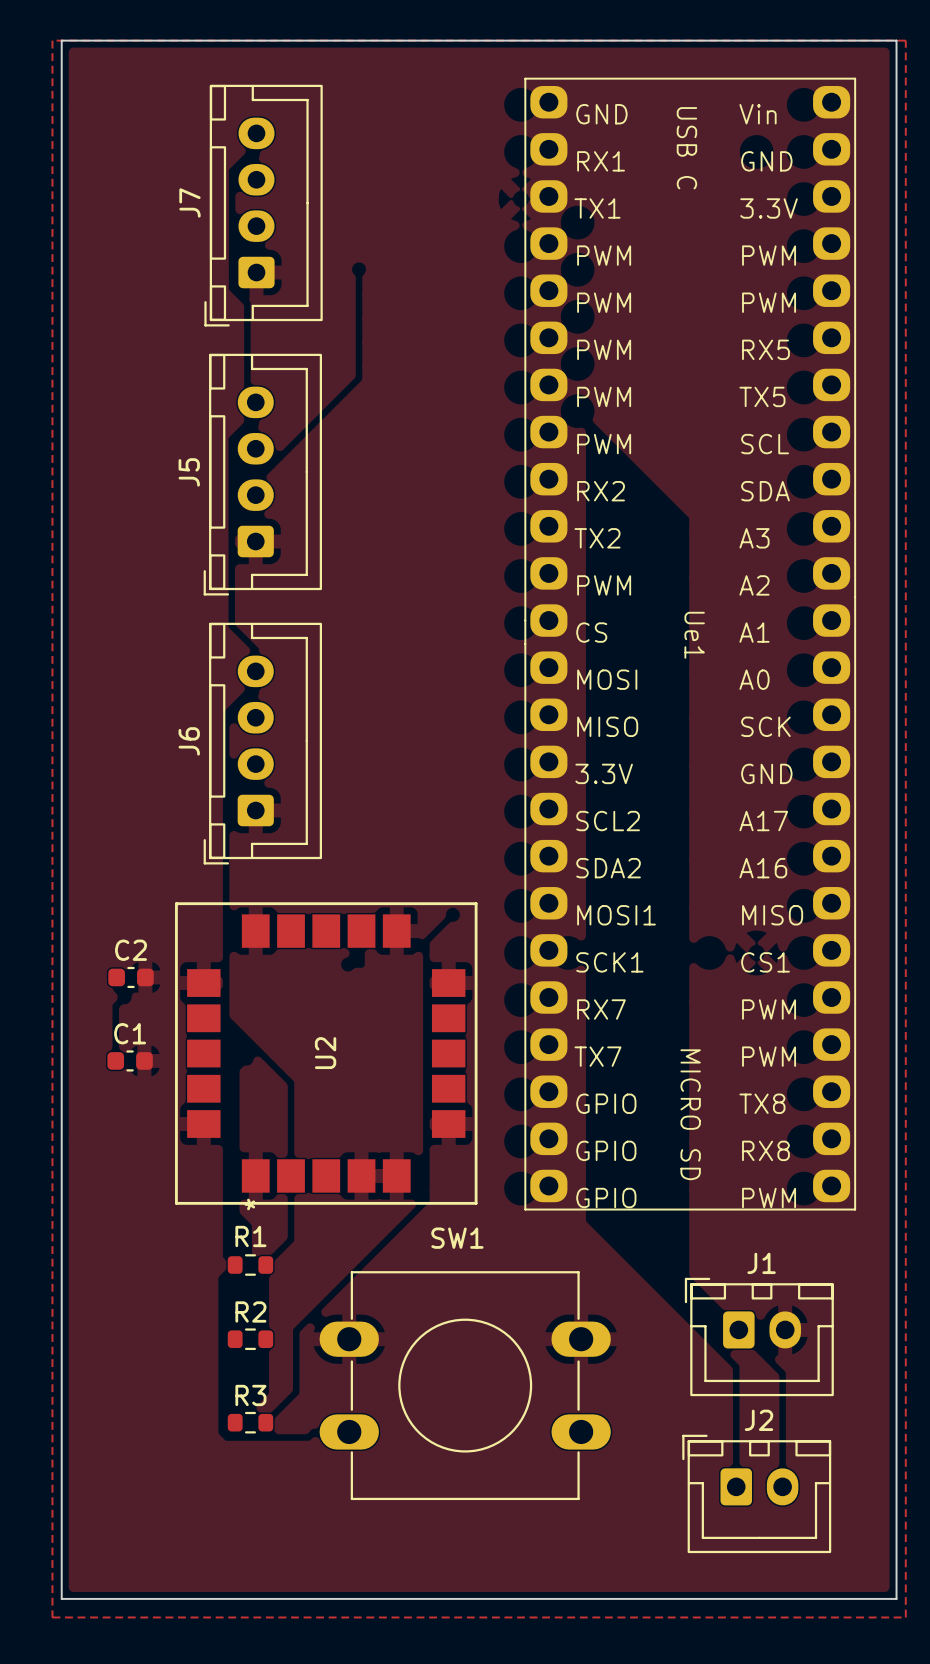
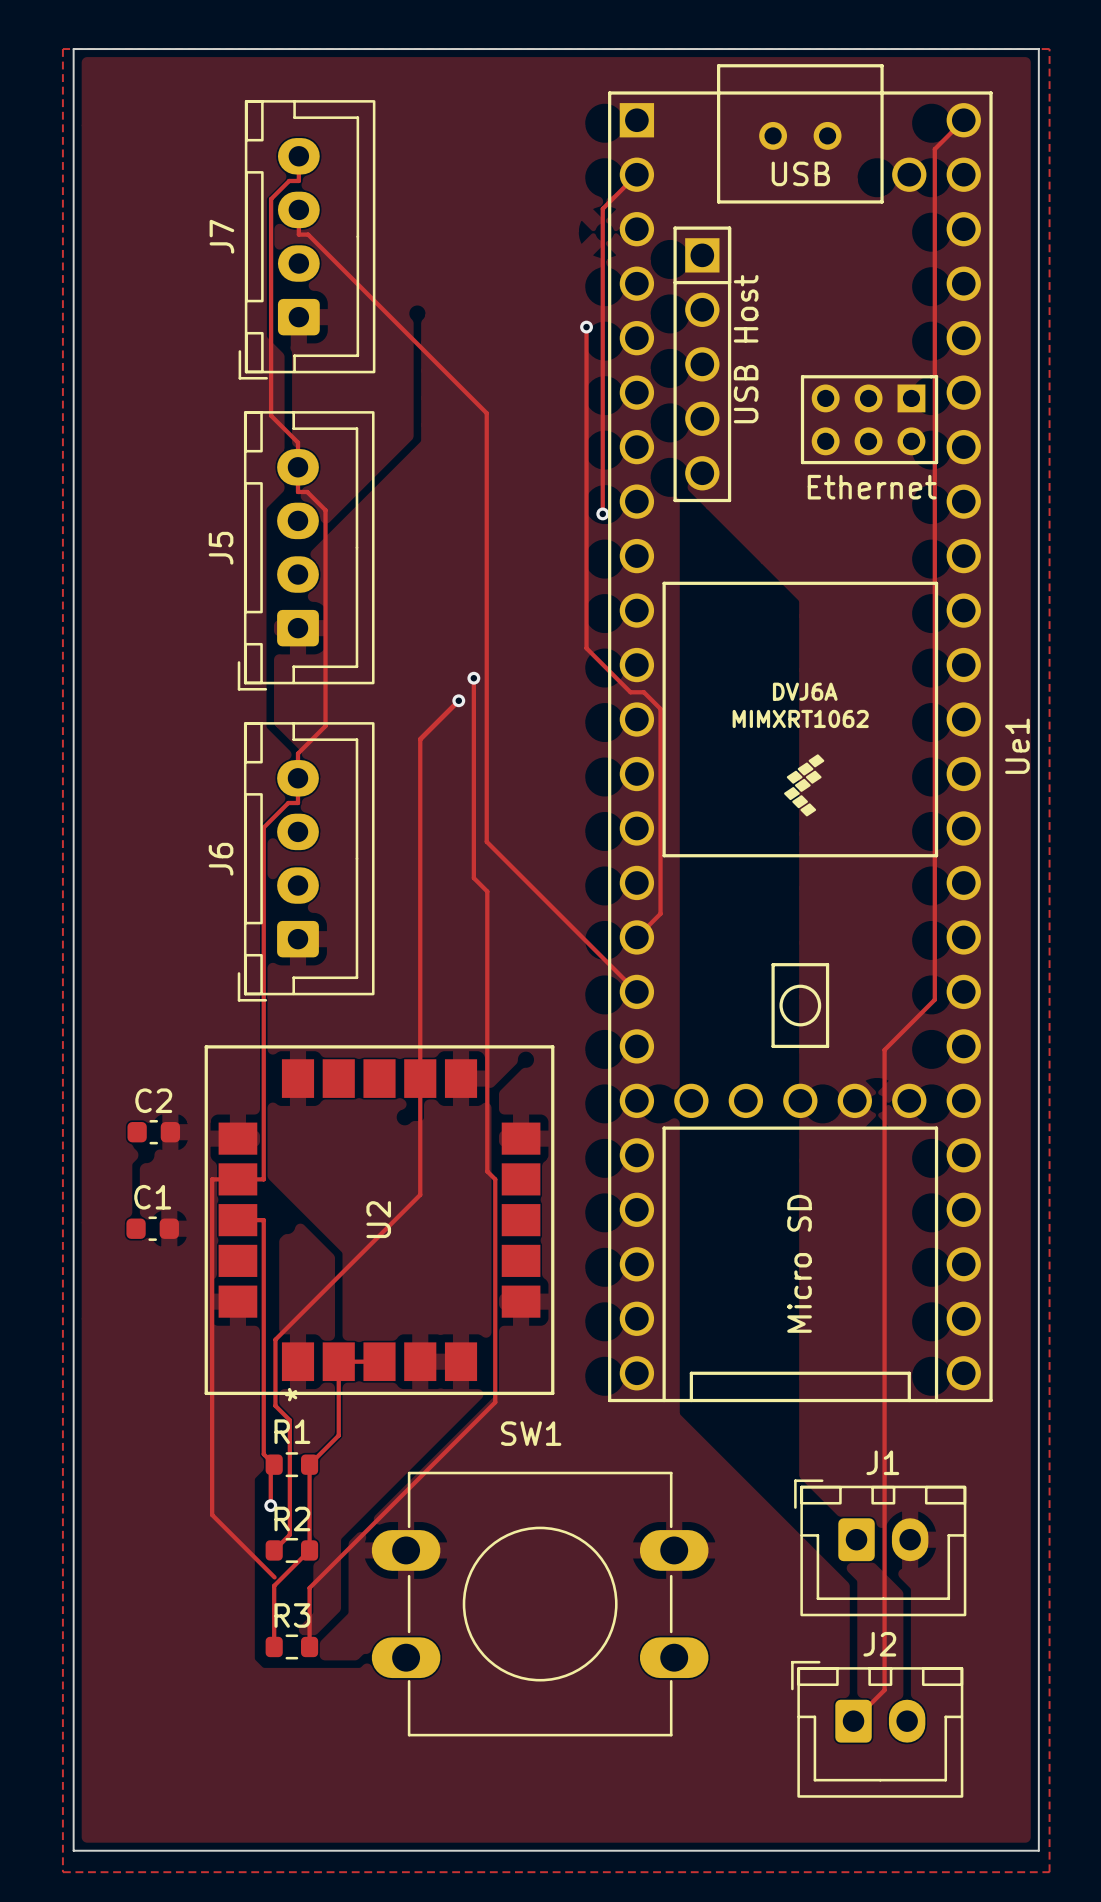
Ue1 footprint: [524, 77, 857, 1211] -> [608, 64, 993, 1403]
track: none -> (963, 120) (934, 149) (934, 999) (884, 1049) (884, 1690) (853, 1721)
track: none -> (298, 156) (298, 180) (289, 180) (271, 199) (271, 415) (298, 442) (298, 491) (307, 491) (325, 510) (325, 726) (298, 753) (298, 802) (288, 802) (263, 827) (263, 1179) (212, 1179) (212, 1514) (274, 1577)
track: none -> (636, 174) (602, 208) (602, 513)
track: none -> (298, 209) (298, 234) (308, 234) (486, 413) (486, 841) (636, 991)
track: none -> (586, 327) (586, 648) (630, 692) (643, 692) (660, 708) (660, 913) (636, 937)
via: none -> (586, 327)
via: none -> (602, 513)
track: none -> (473, 678) (473, 878) (487, 891) (487, 1171) (495, 1179) (495, 1402) (309, 1587) (309, 1646)
via: none -> (473, 678)
track: none -> (458, 700) (420, 739) (420, 1194) (275, 1339) (275, 1405) (289, 1420) (289, 1534) (274, 1550)
via: none -> (458, 700)
Ue1 name position: Ue1 (694, 635) -> Ue1 (1017, 746)
track: none -> (237, 1220) (263, 1220) (263, 1454) (274, 1464) (270, 1468) (270, 1505)
track: none -> (379, 1361) (338, 1361) (338, 1435) (309, 1464) (309, 1550) (274, 1585) (274, 1646)
via: none -> (270, 1505)

